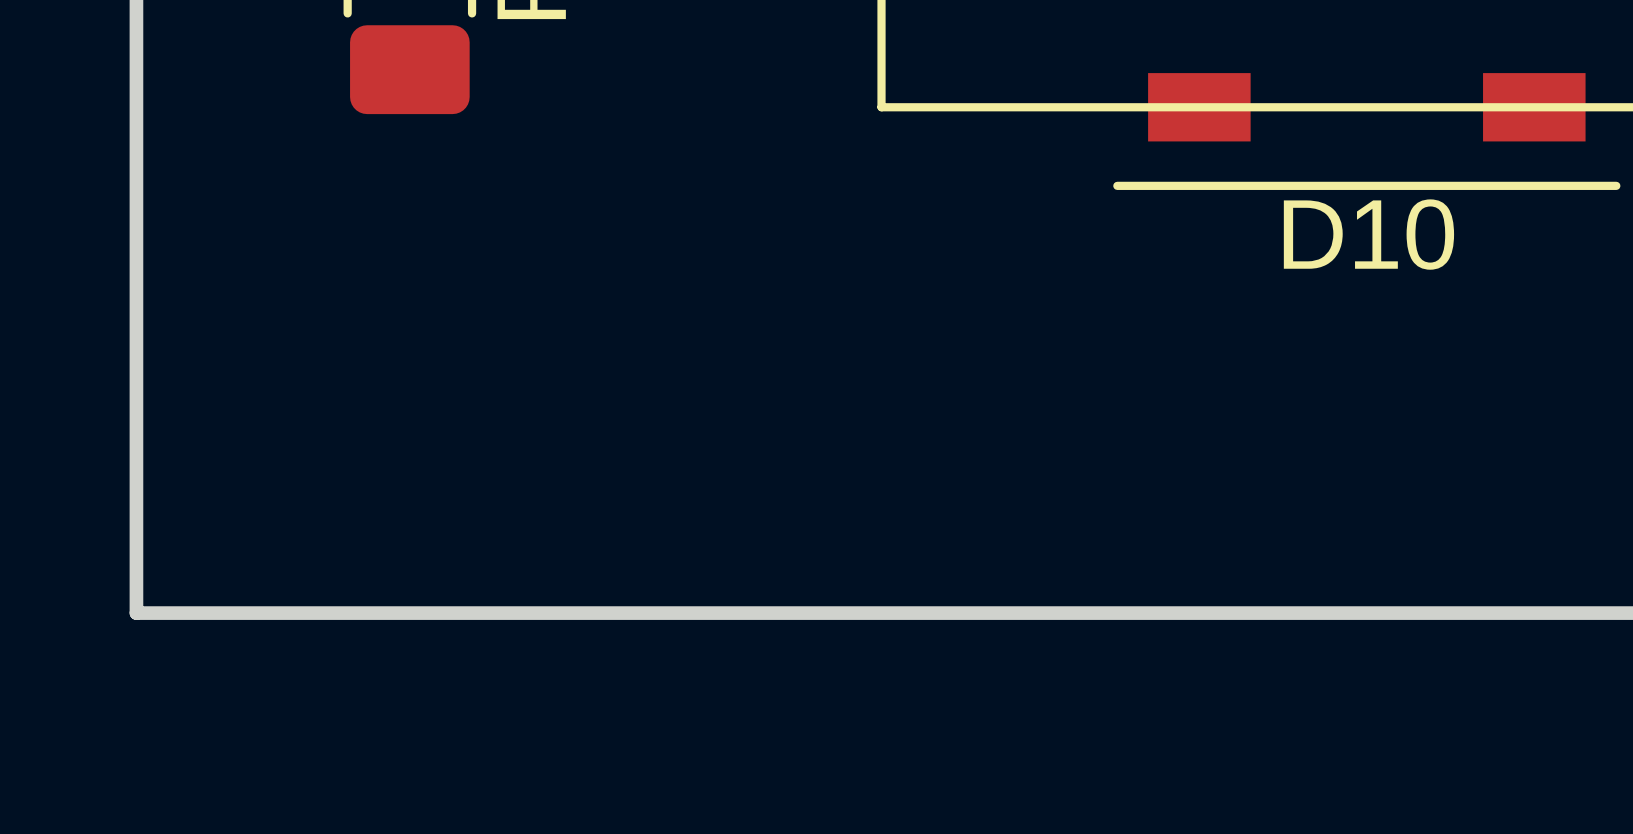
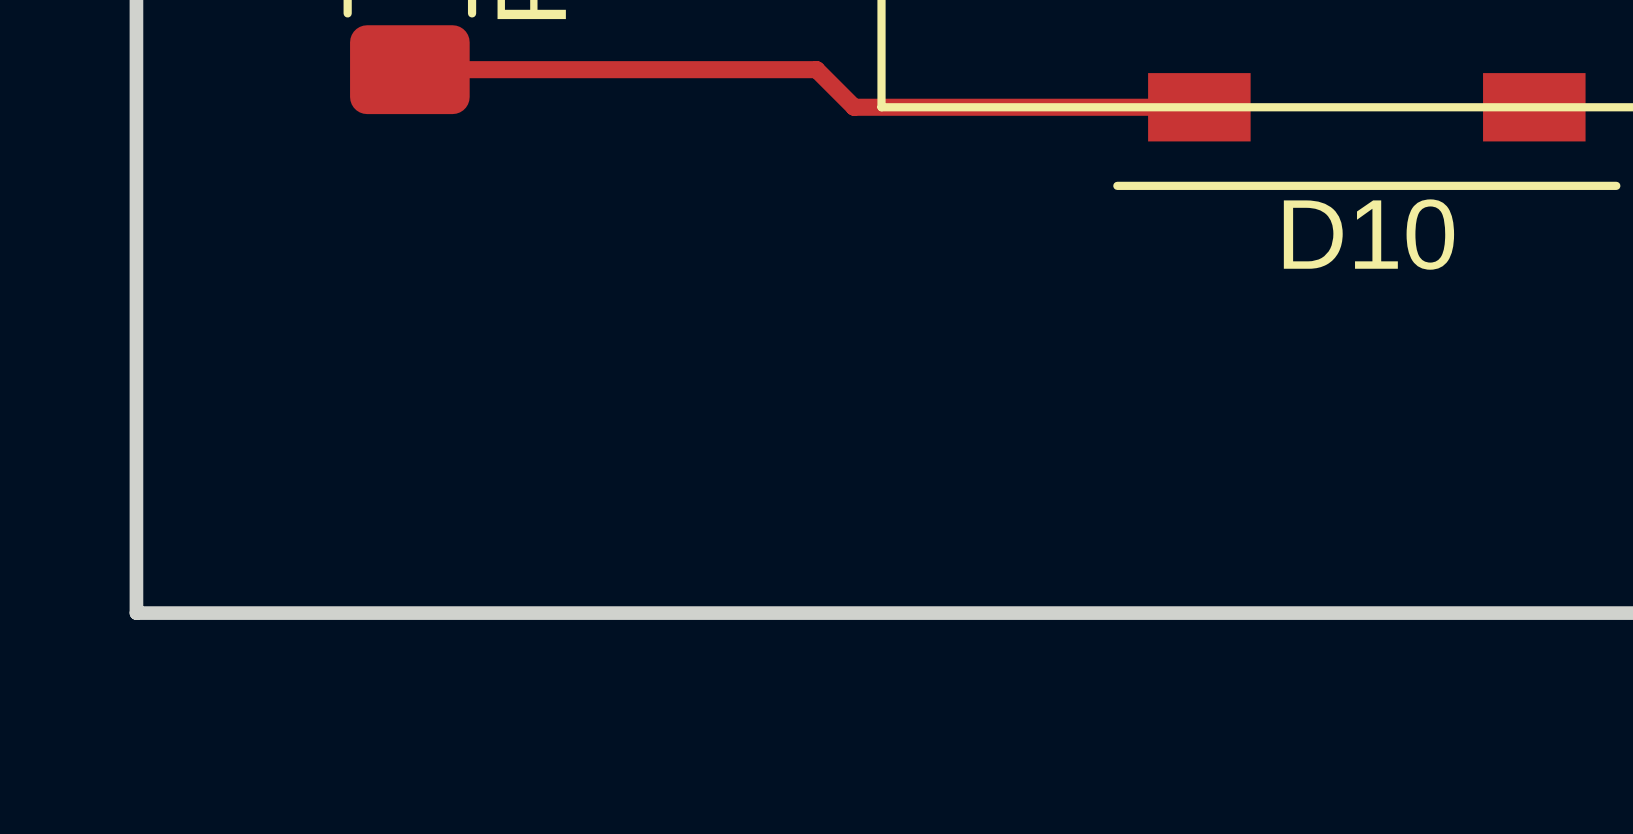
track: none -> (409, 69) (816, 69) (854, 107) (1199, 107)

